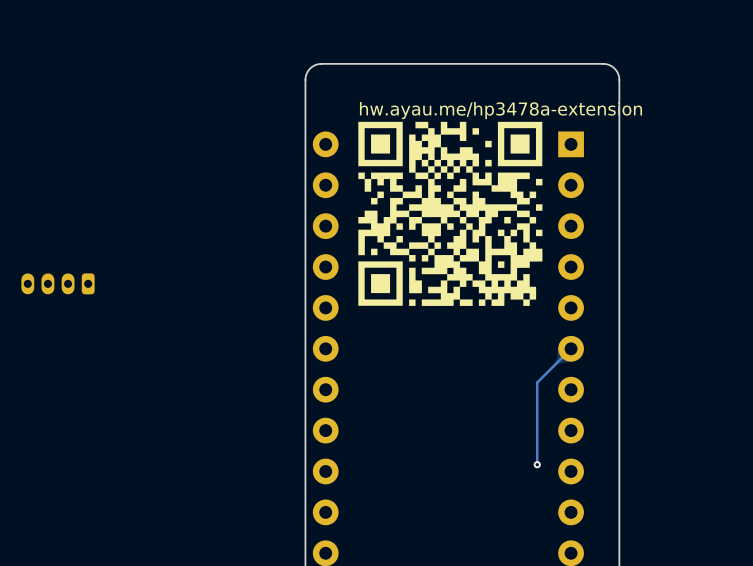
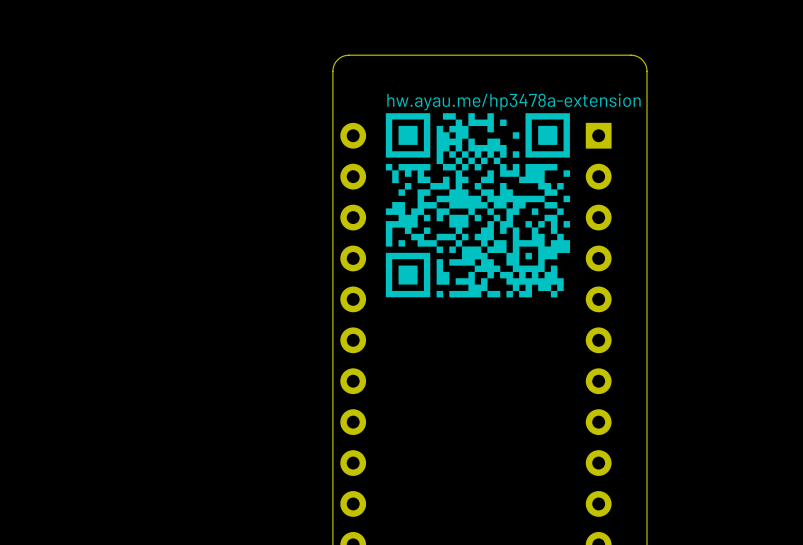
part: (58, 283) -> none
track: (571, 348) (537, 382) (537, 464) -> none
via: (537, 464) -> none

